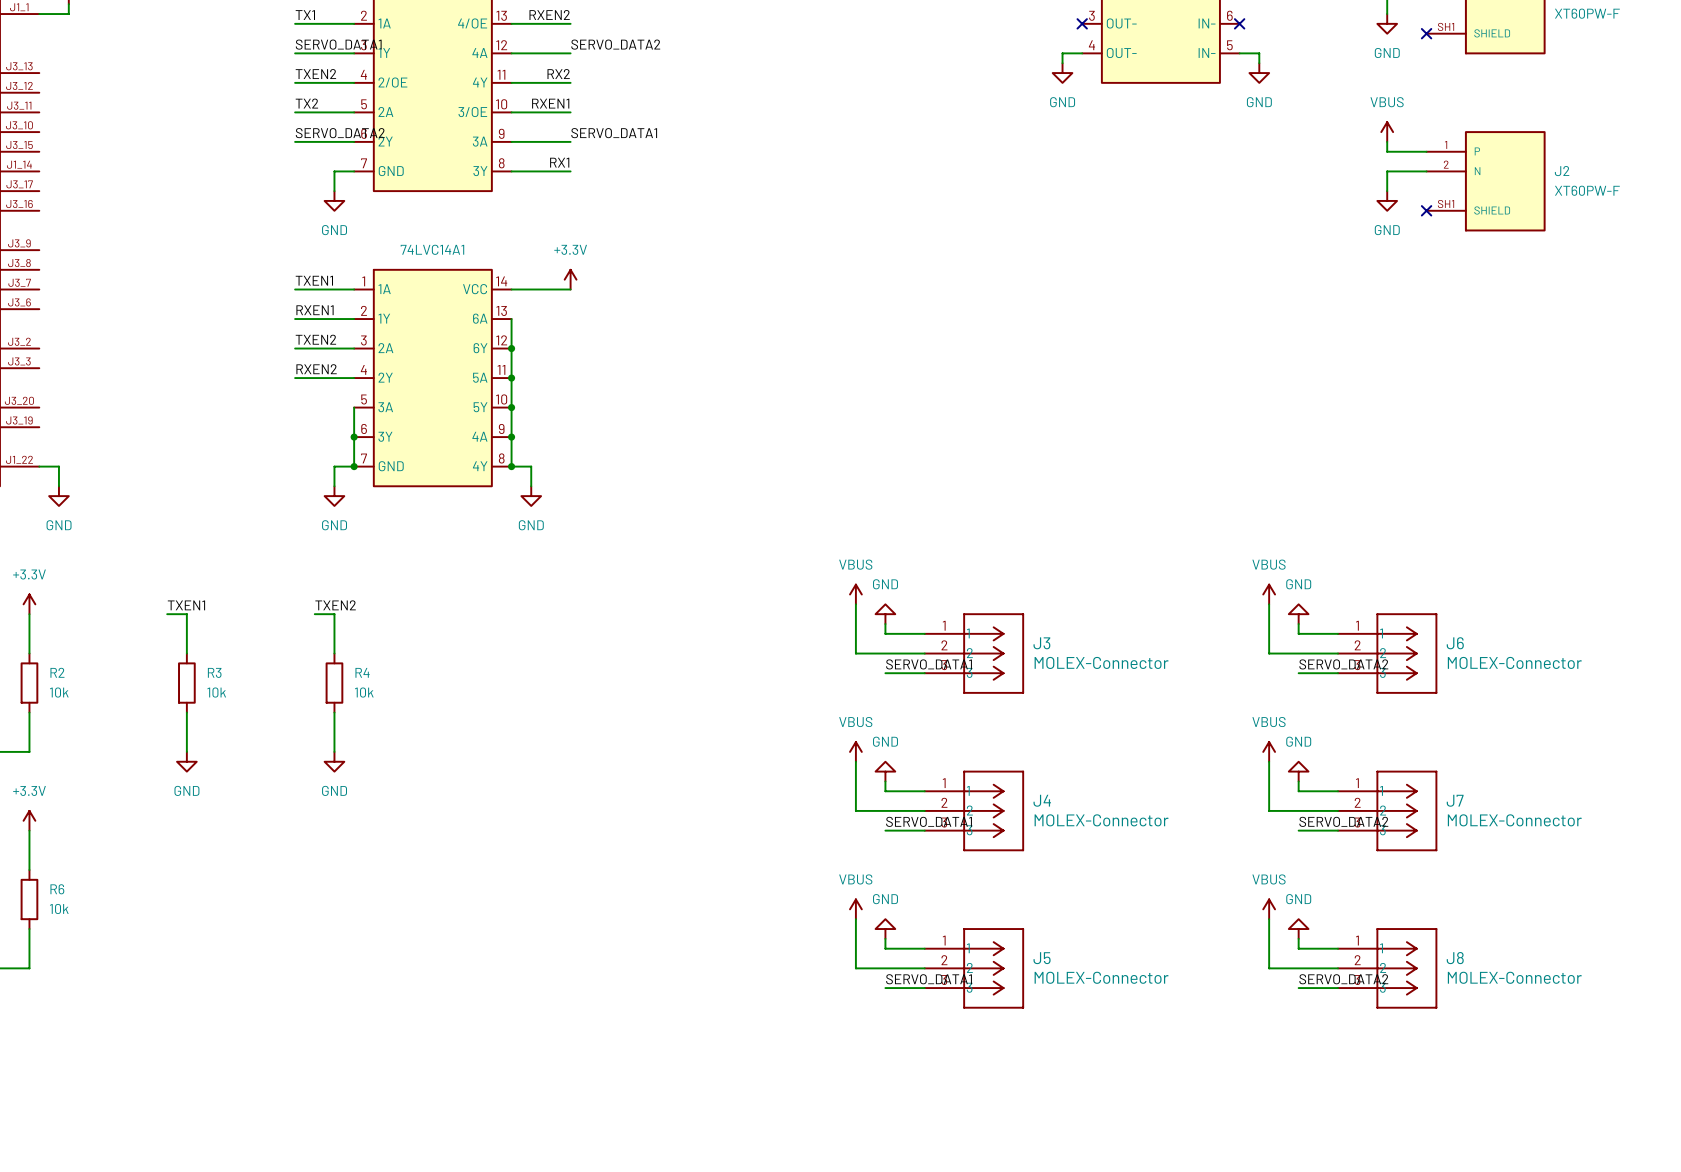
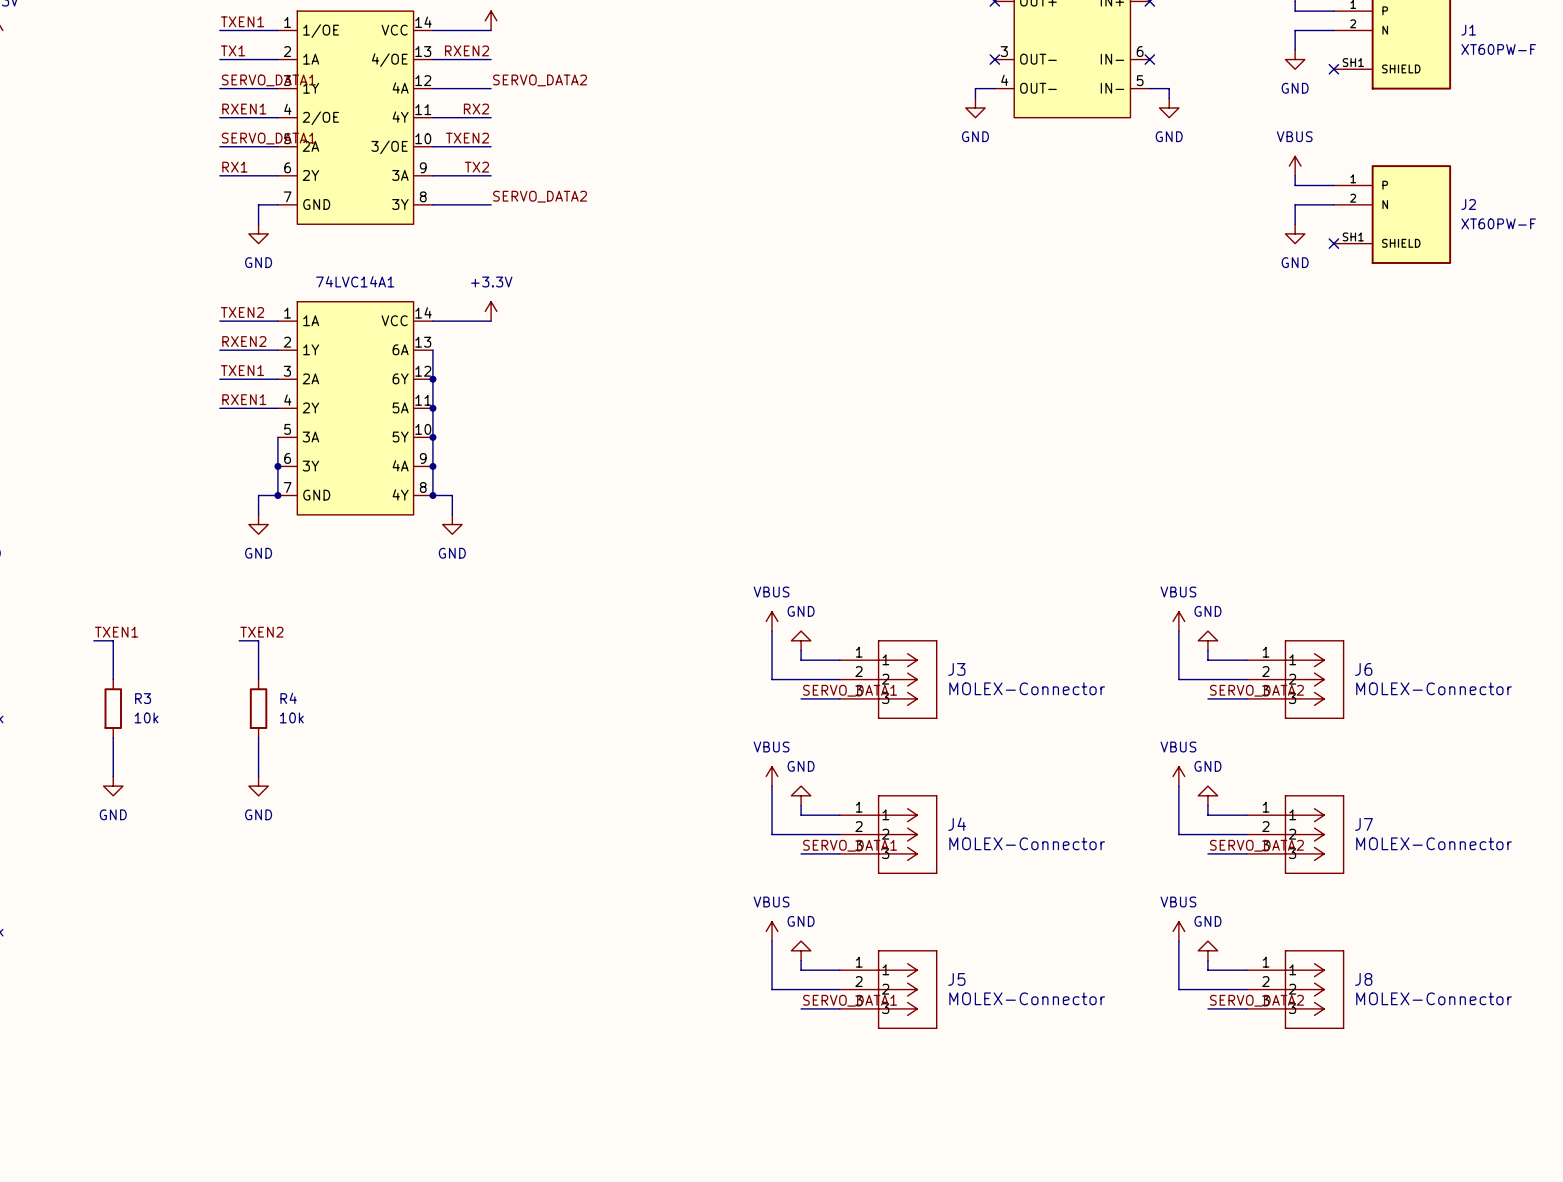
label: TXEN2 (315, 74) -> RXEN1 (244, 109)
label: TX2 (306, 103) -> SERVO_DATA1 (268, 138)
label: RXEN1 (550, 103) -> TXEN2 (467, 138)
label: SERVO_DATA2 (340, 133) -> RX1 (234, 167)
label: SERVO_DATA1 (614, 133) -> TX2 (476, 167)
label: RX1 (559, 162) -> SERVO_DATA2 (540, 196)
label: TXEN1 (314, 280) -> TXEN2 (242, 312)
label: RXEN1 (315, 310) -> RXEN2 (244, 341)
label: TXEN2 (315, 339) -> TXEN1 (242, 370)
label: RXEN2 (316, 369) -> RXEN1 (244, 399)

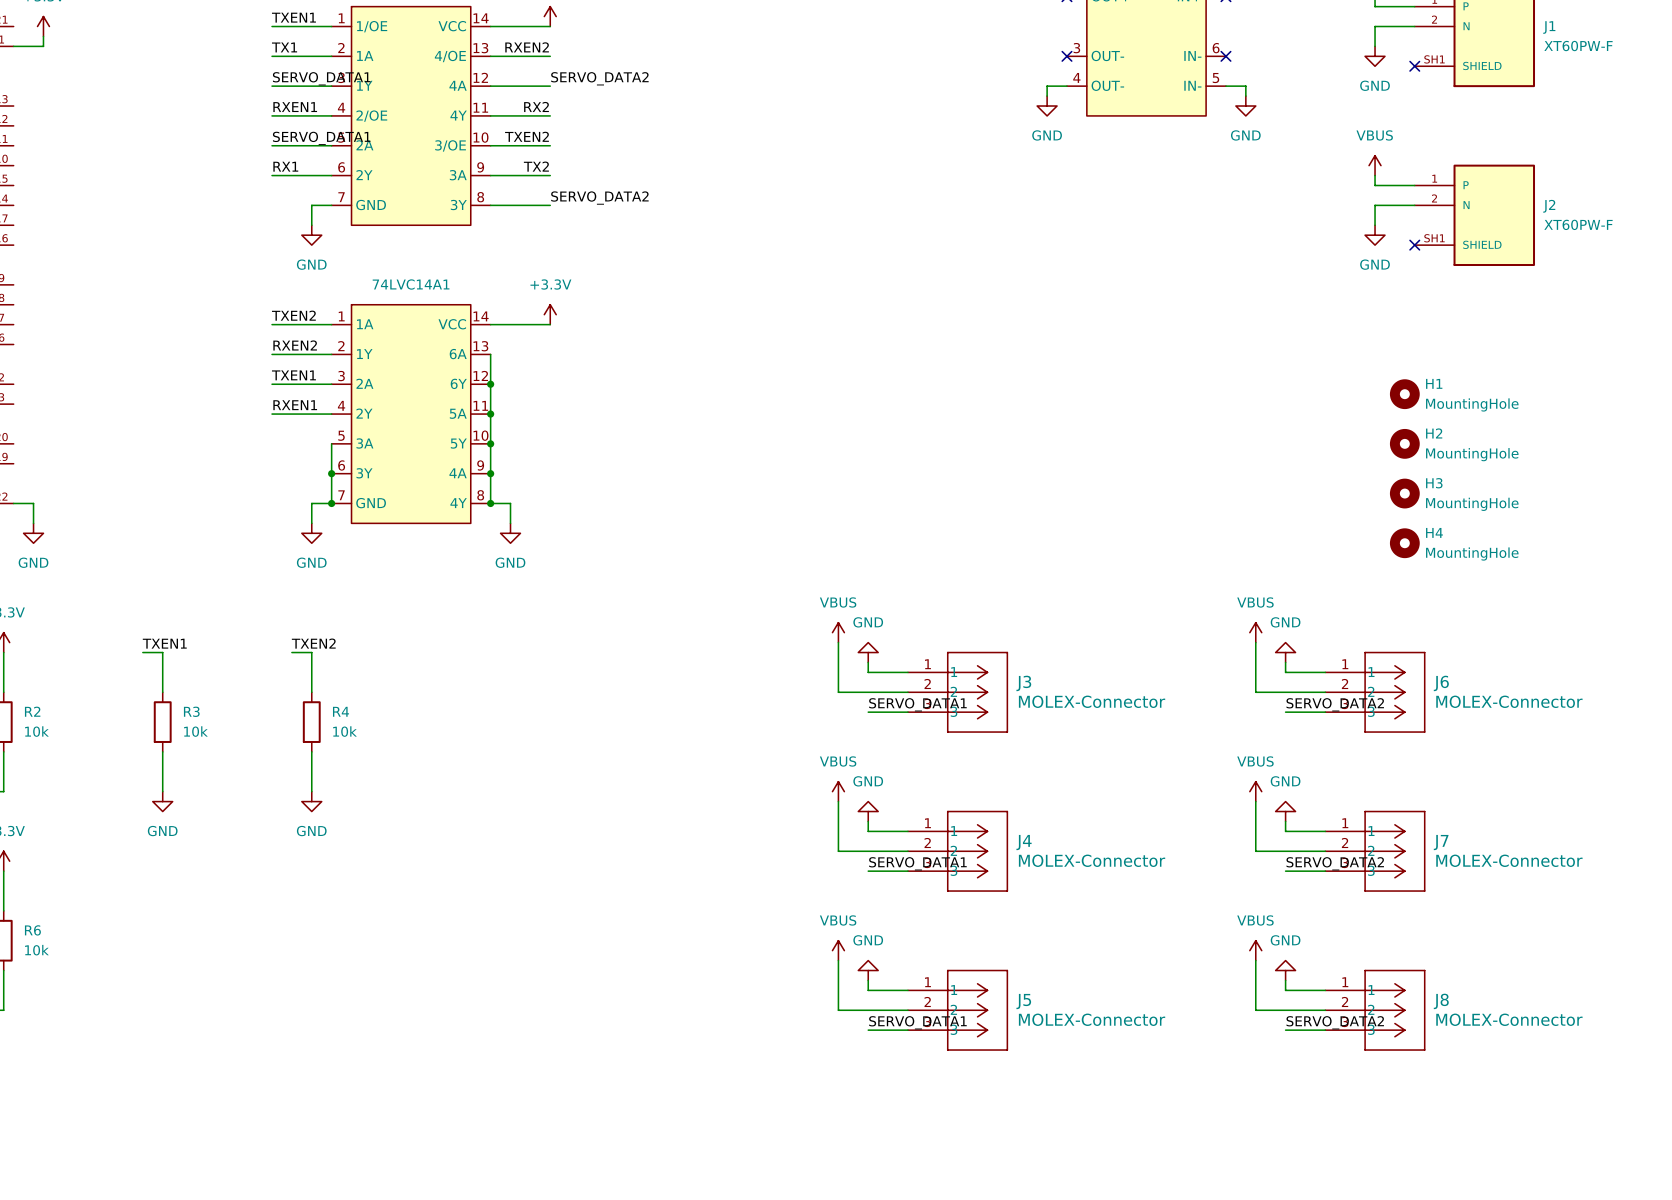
H1: none -> MountingHole (1404, 394)
H2: none -> MountingHole (1404, 443)
H3: none -> MountingHole (1404, 493)
H4: none -> MountingHole (1404, 543)

